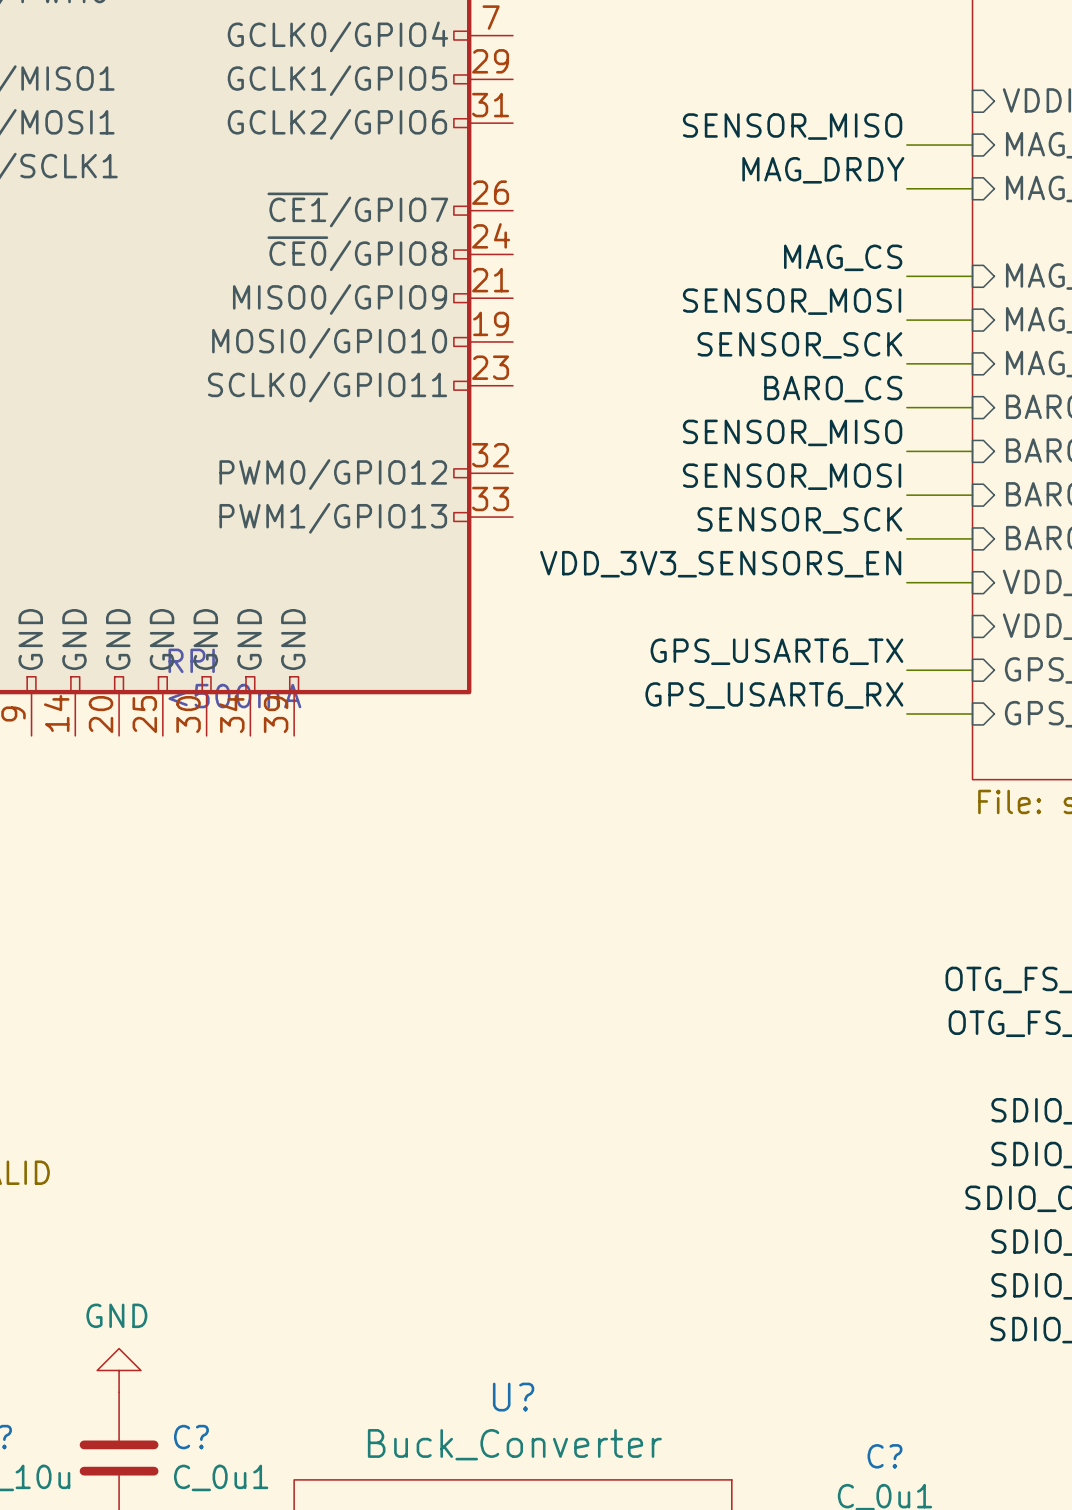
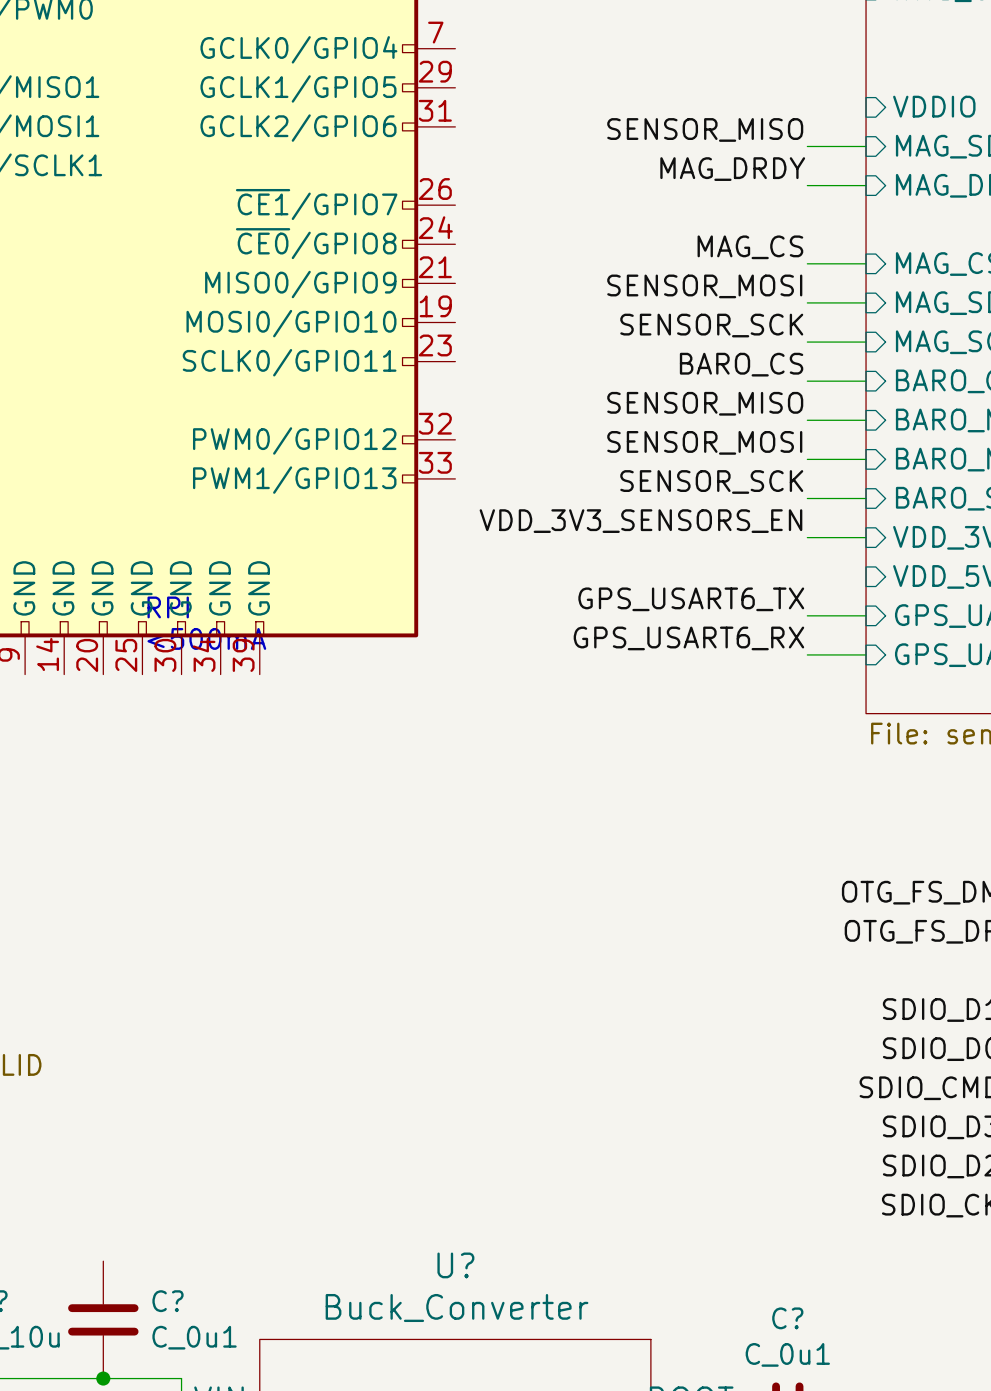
power symbol: GND (119, 1370) -> none

